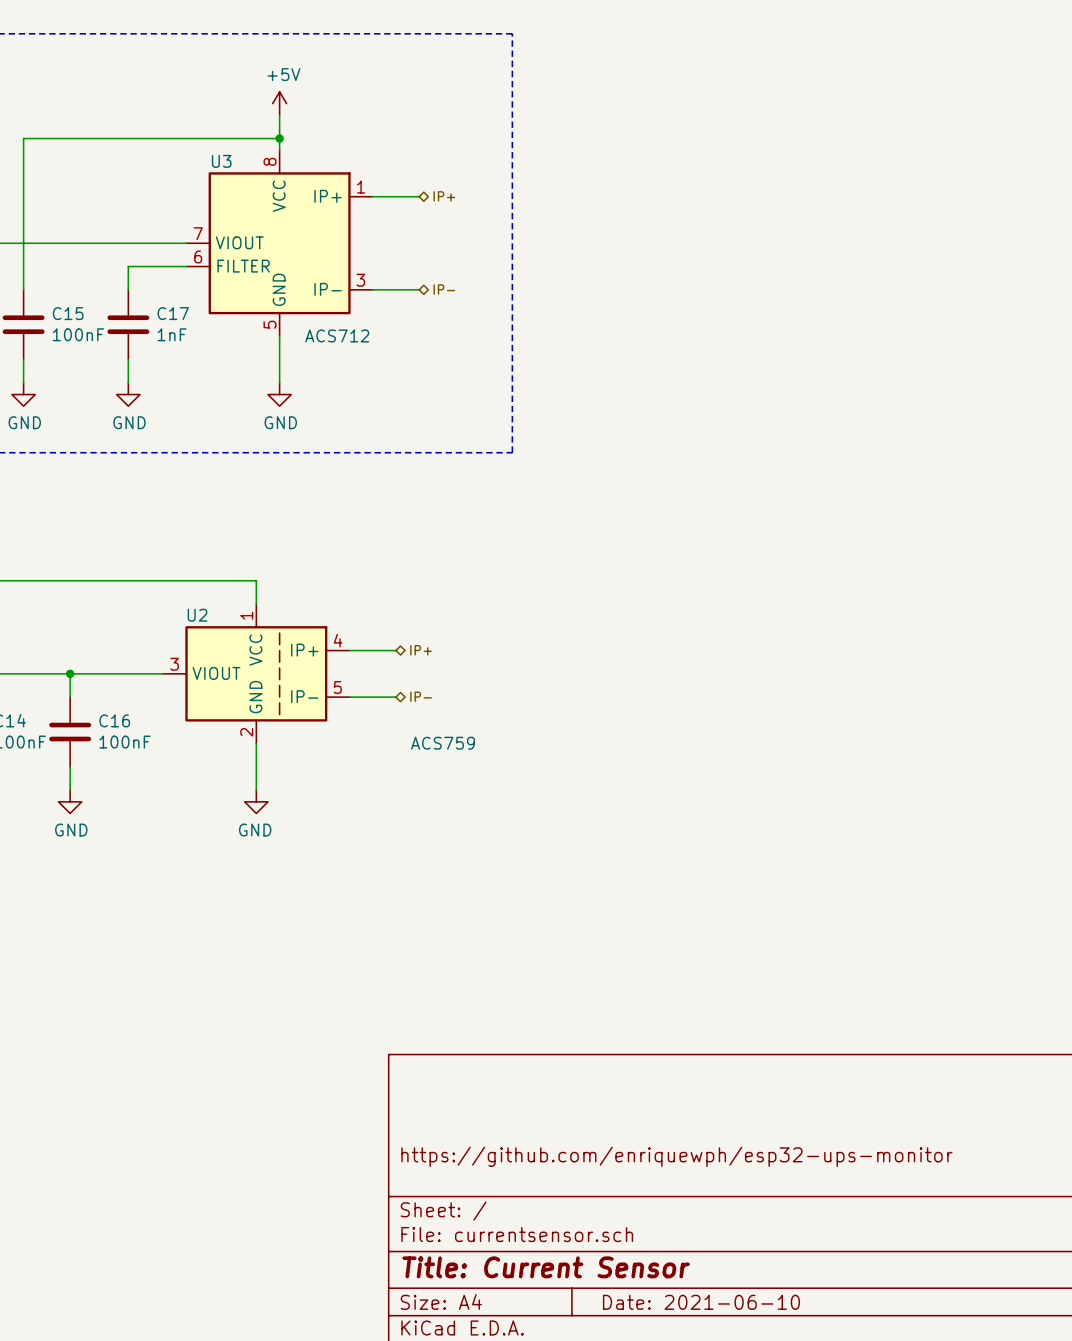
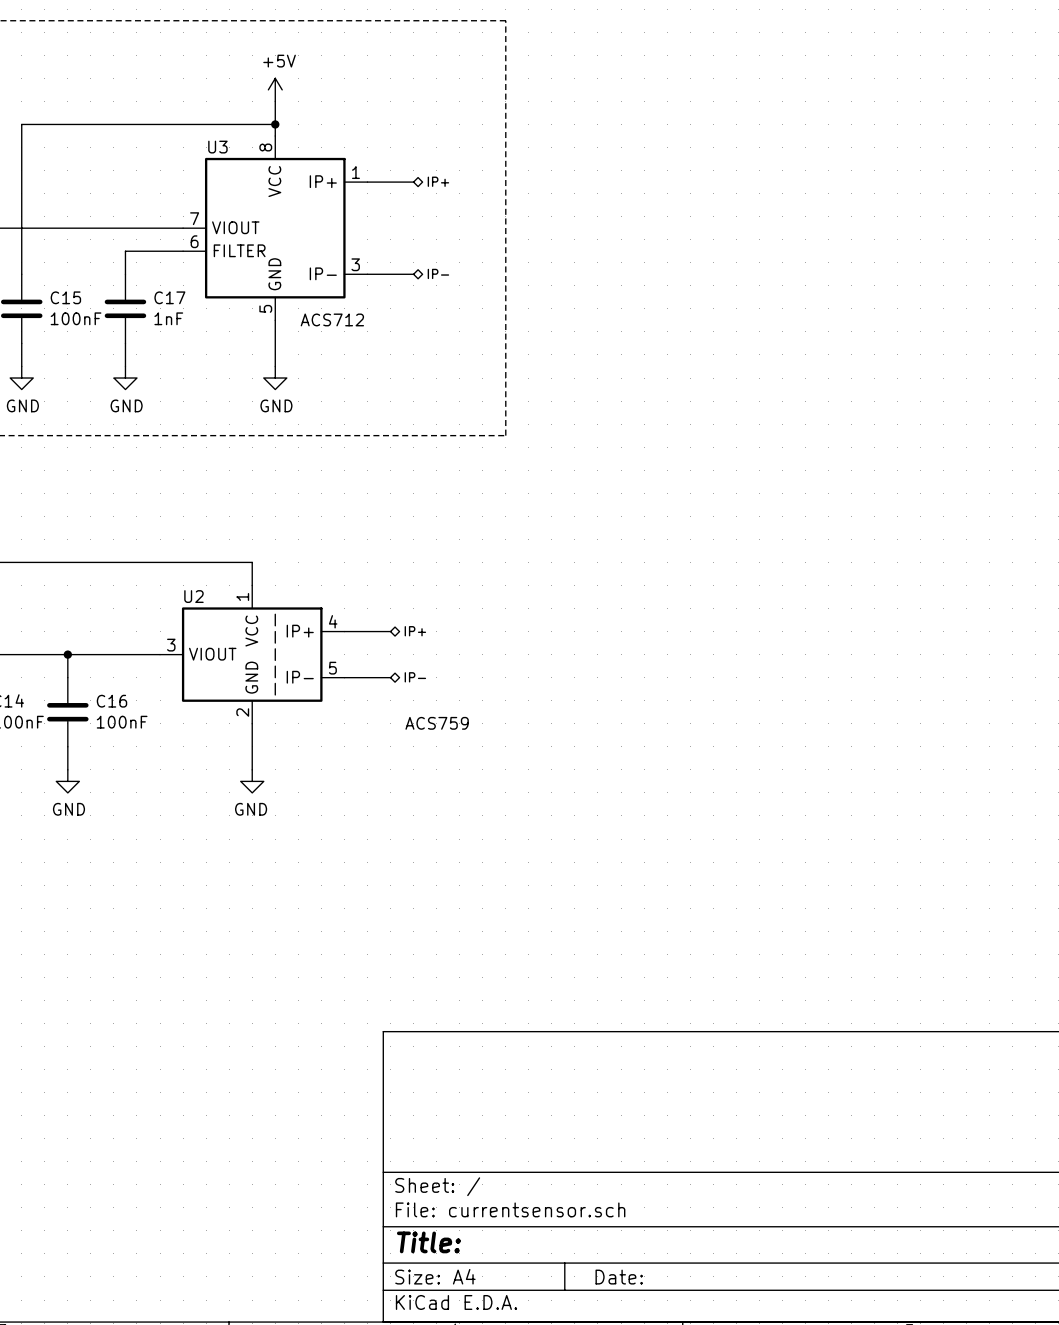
title block: https://github.com/enriquewph/esp32-ups-monitor (676, 1156) -> none
title block: Title: Current Sensor (546, 1267) -> Title: (428, 1242)
title block: Date: 2021-06-10 (701, 1302) -> Date: (619, 1277)

